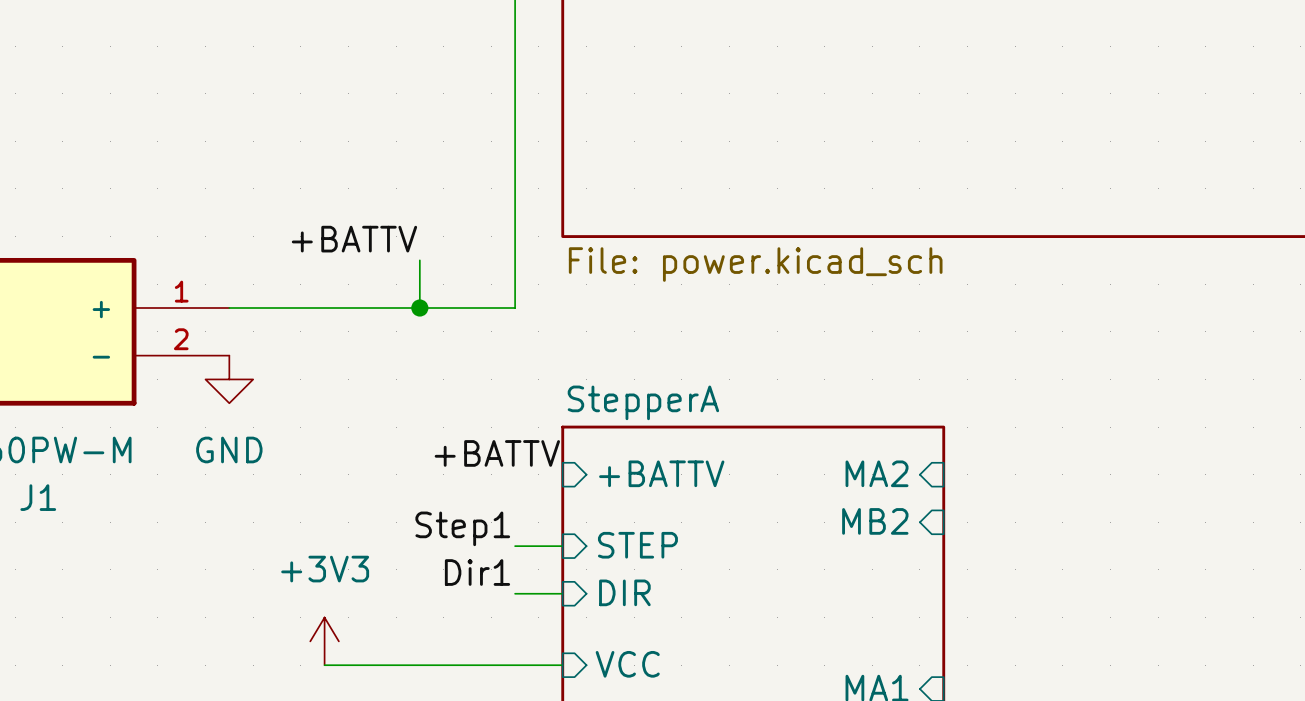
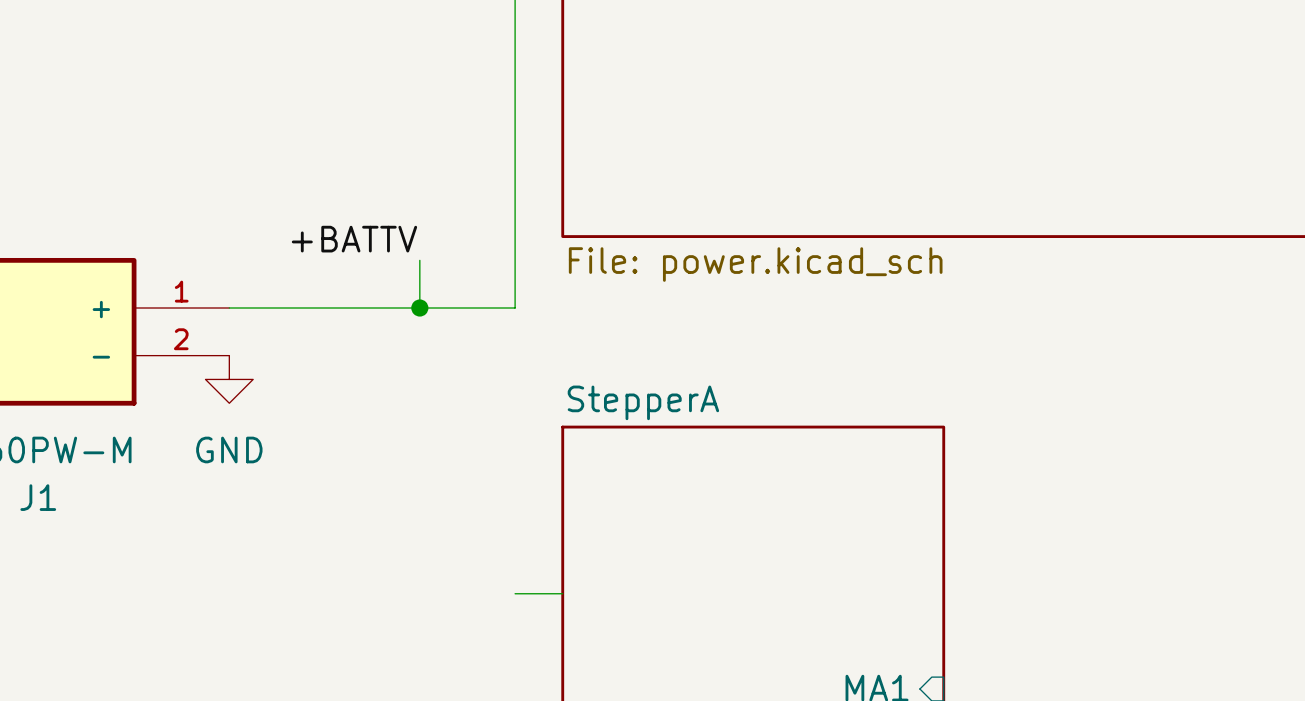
label: +BATTV (497, 453) -> none
sheet pin: +BATTV (661, 473) -> none
sheet pin: MA2 (877, 473) -> none
sheet pin: MB2 (875, 521) -> none
label: Step1 (462, 528) -> none
sheet pin: STEP (637, 545) -> none
wire: (515, 546) (562, 546) -> none
label: Dir1 (477, 572) -> none
sheet pin: DIR (624, 592) -> none
power symbol: +3V3 (324, 641) -> none
sheet pin: VCC (627, 664) -> none
wire: (324, 665) (562, 665) -> none

